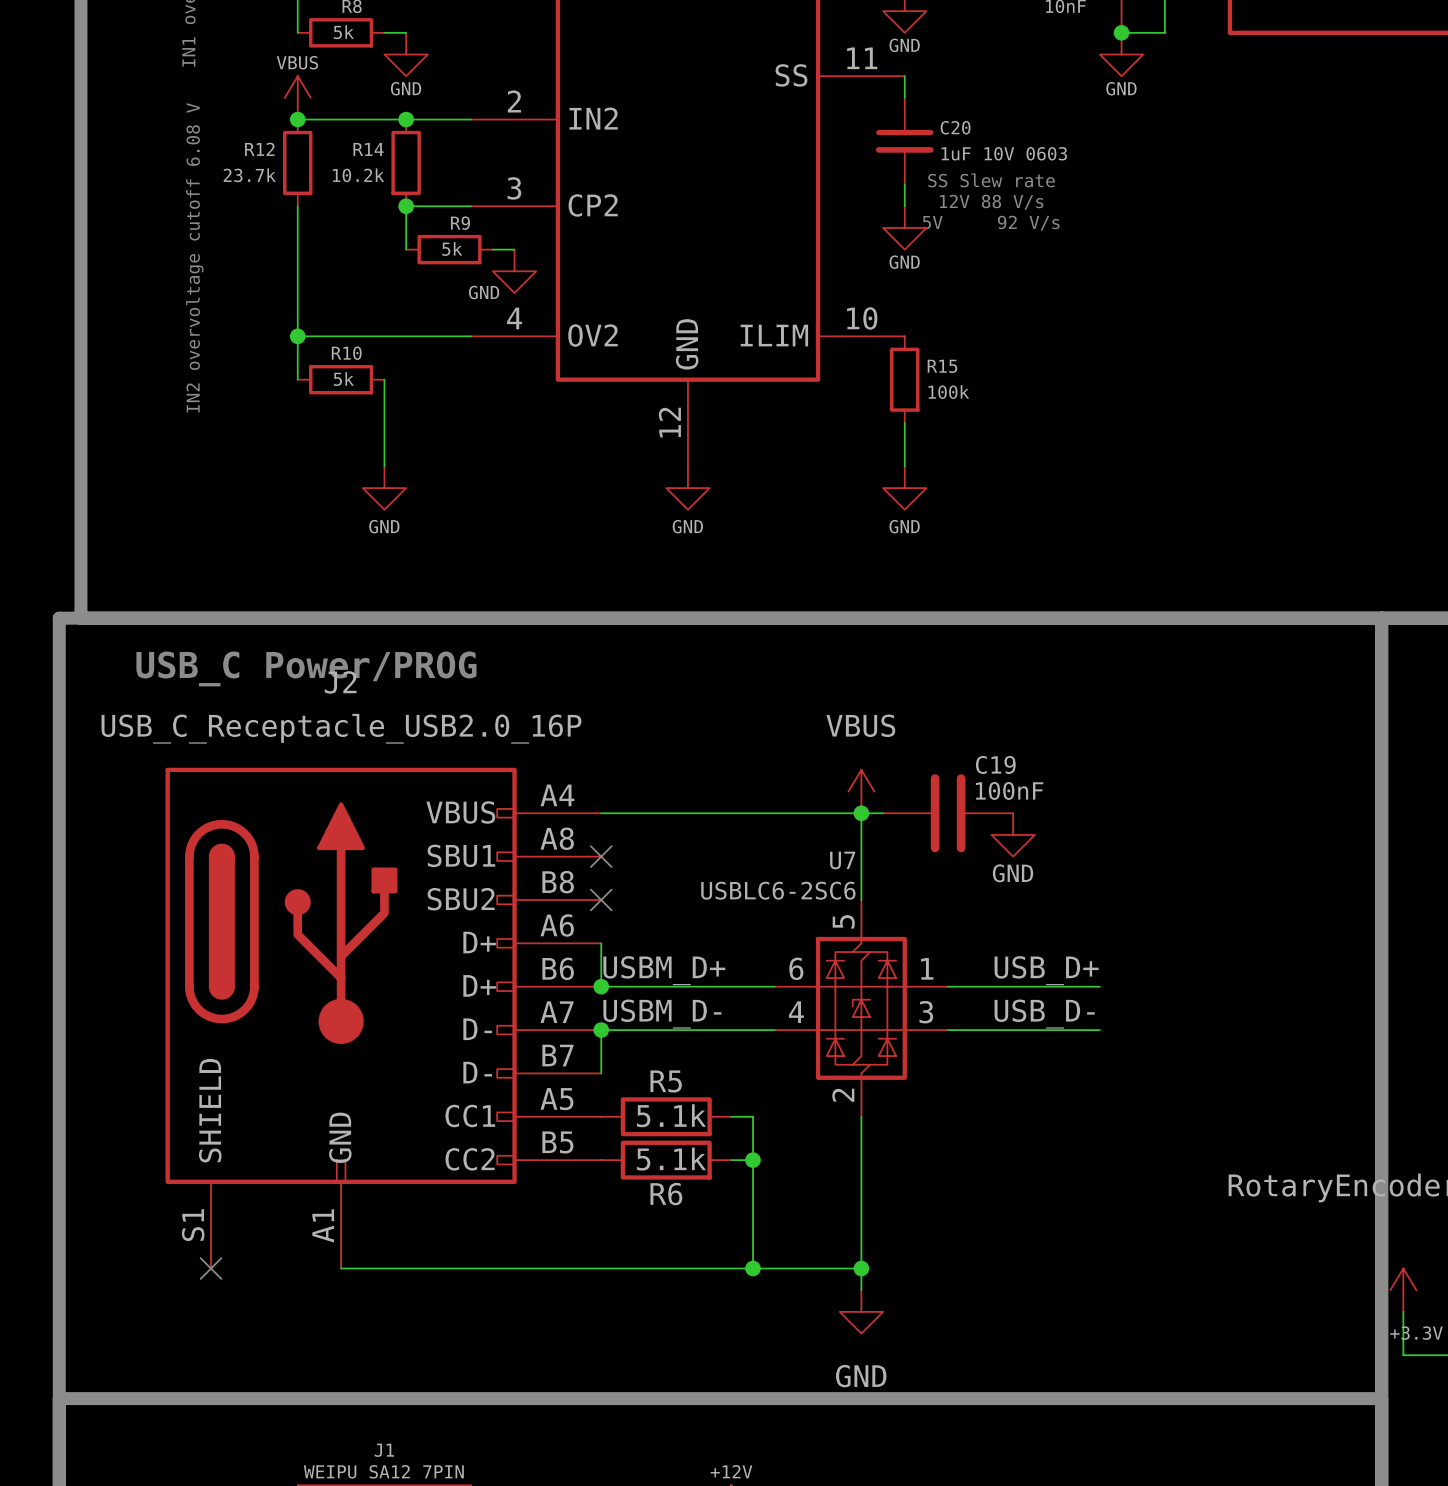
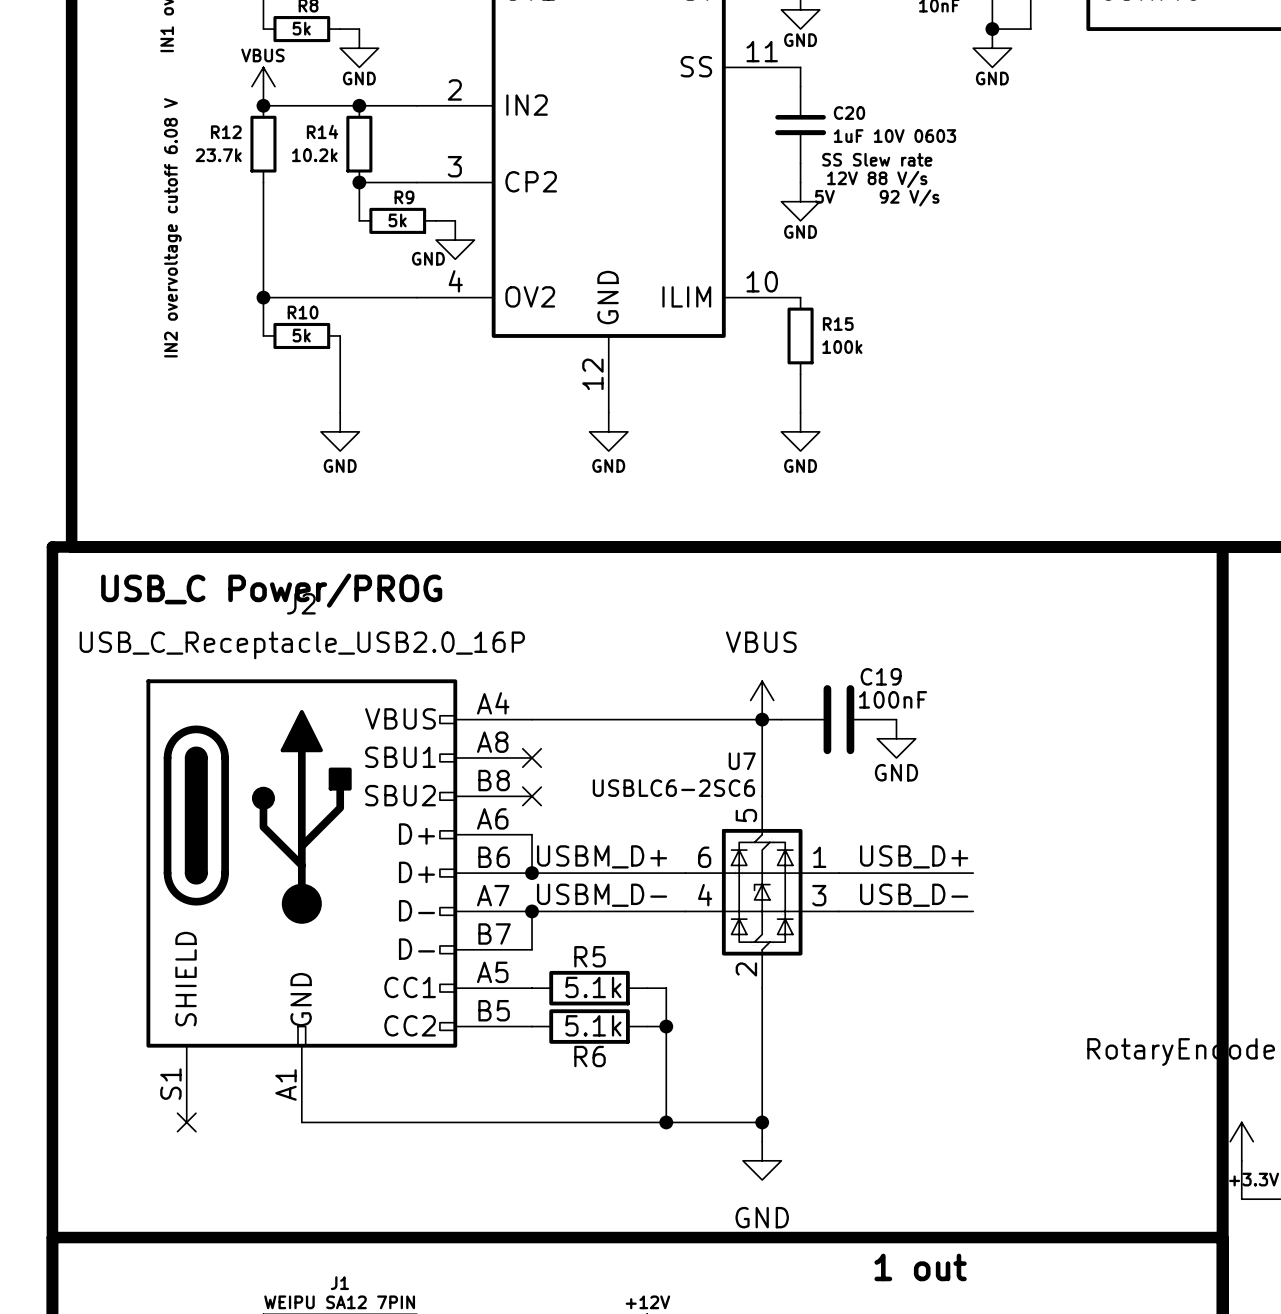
text: none -> 1 out (920, 1267)

